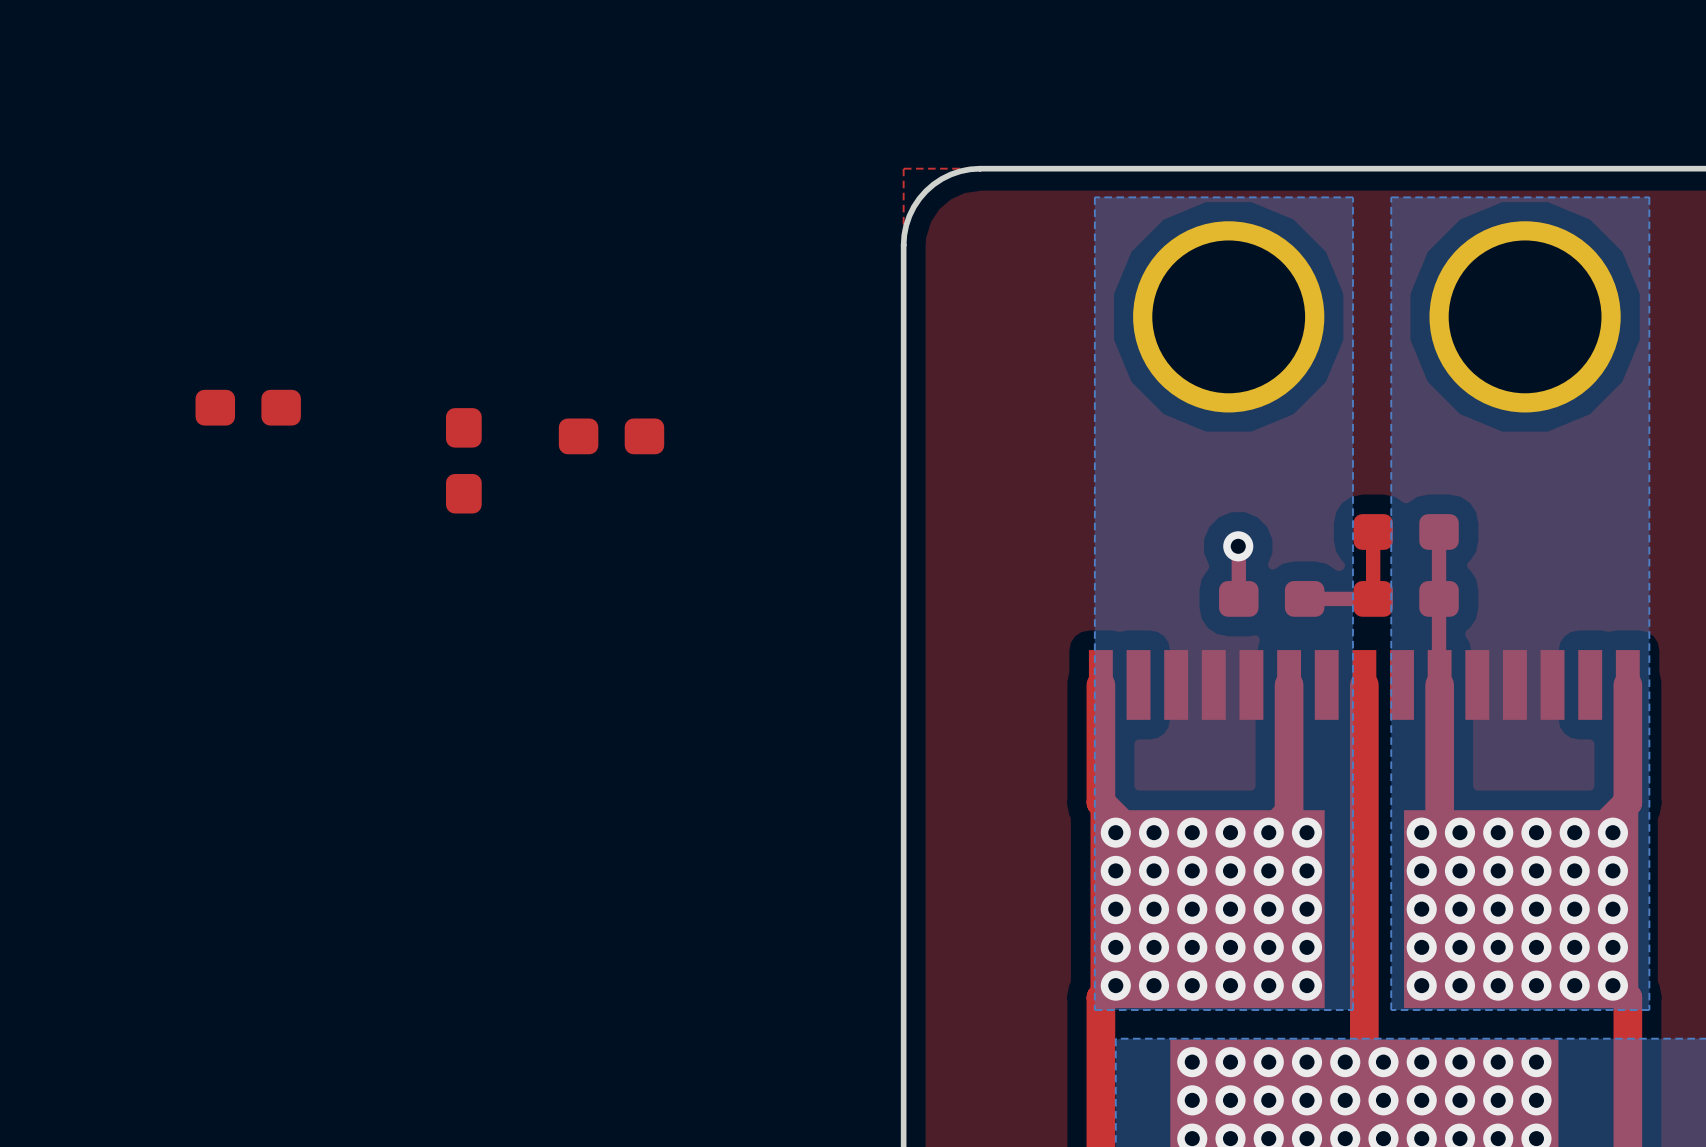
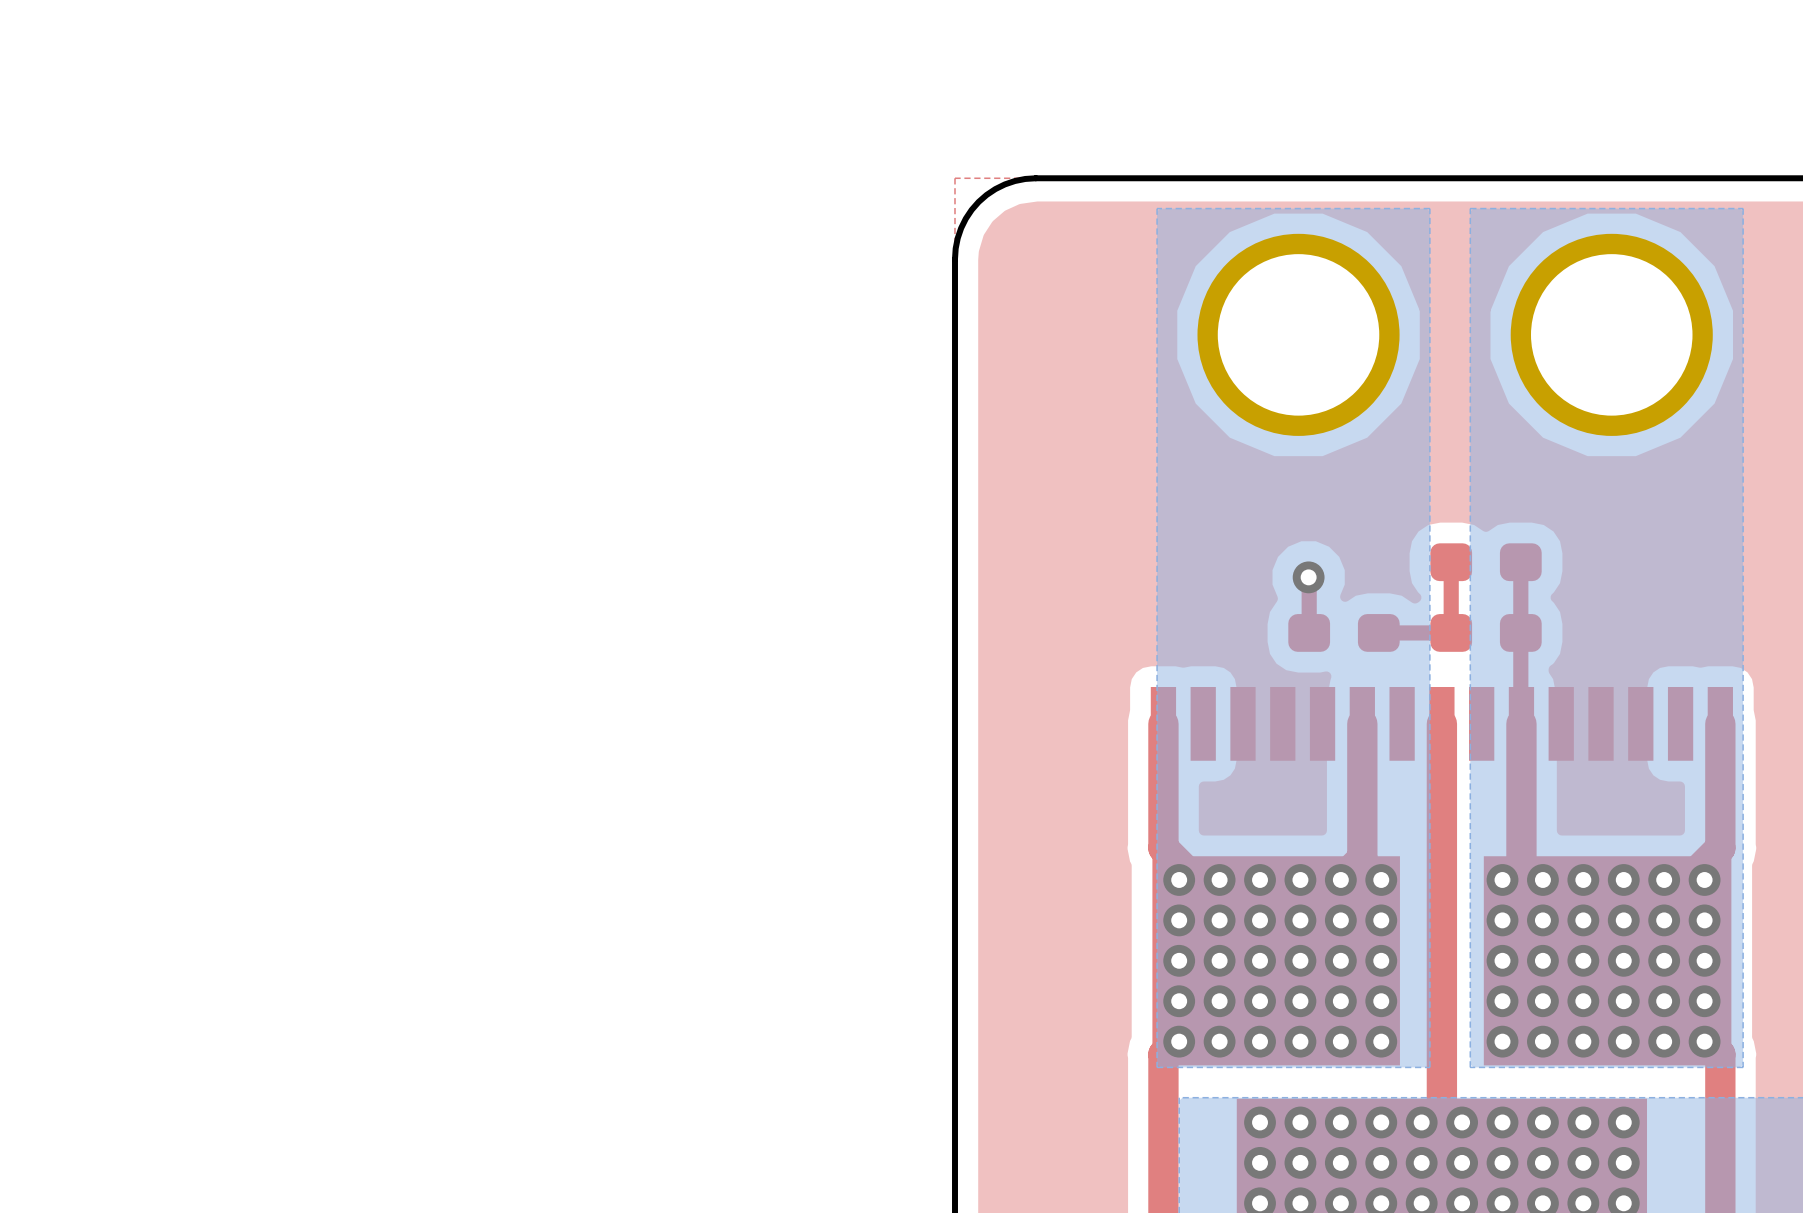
part: (248, 407) -> none
part: (611, 436) -> none
part: (463, 460) -> none

